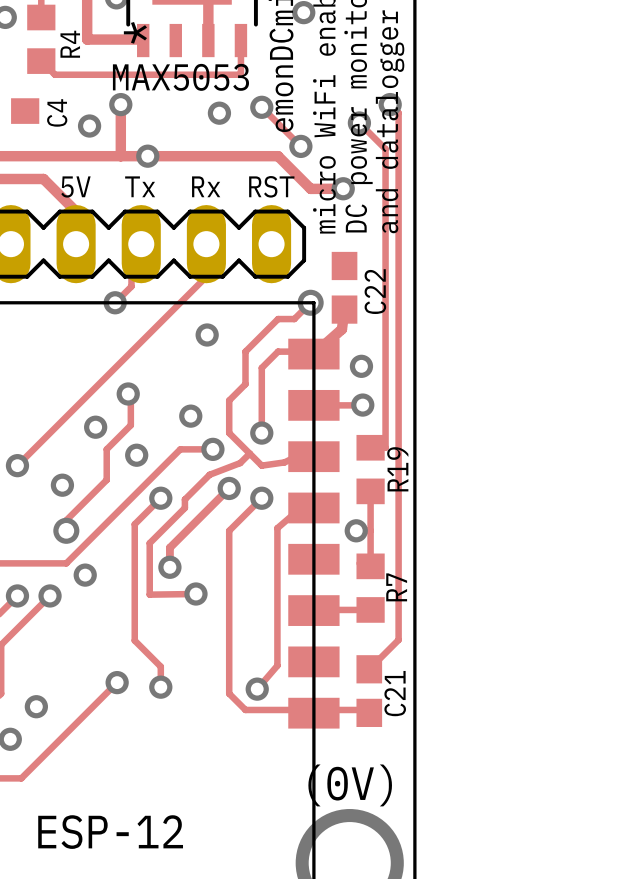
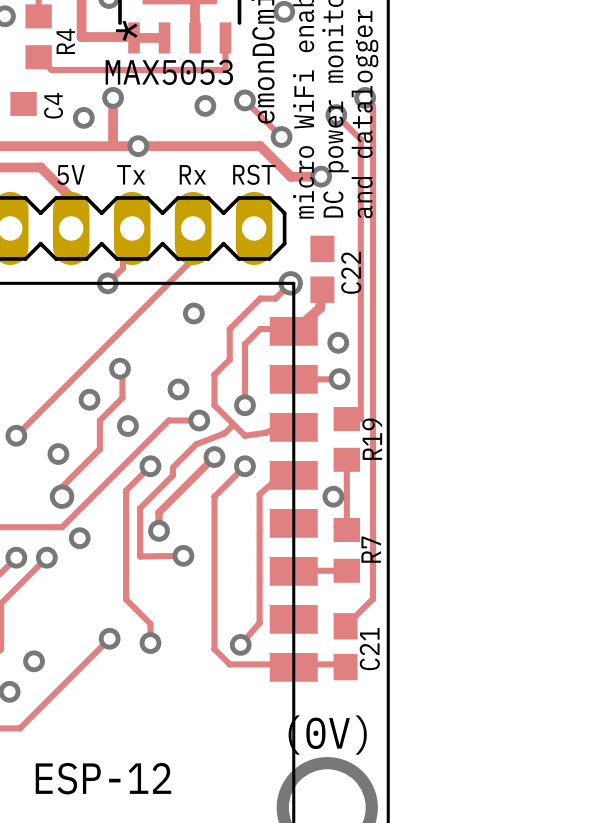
track: none -> (134, 37) (164, 37)

